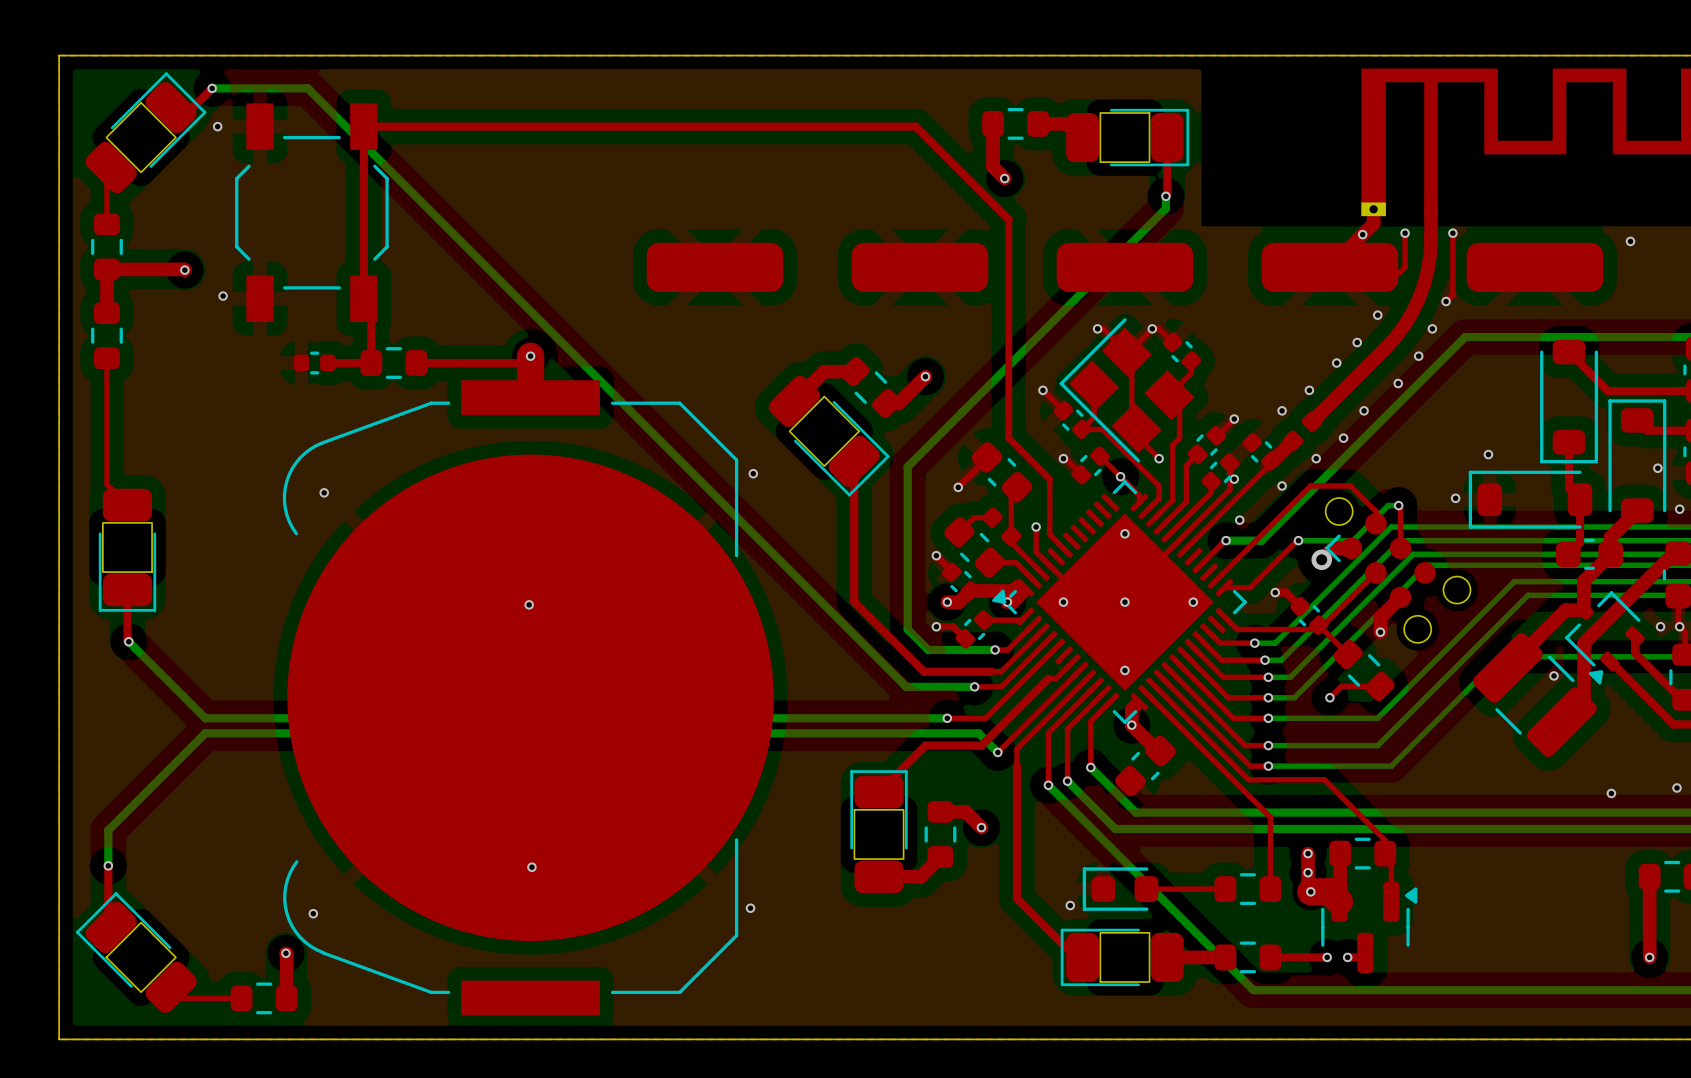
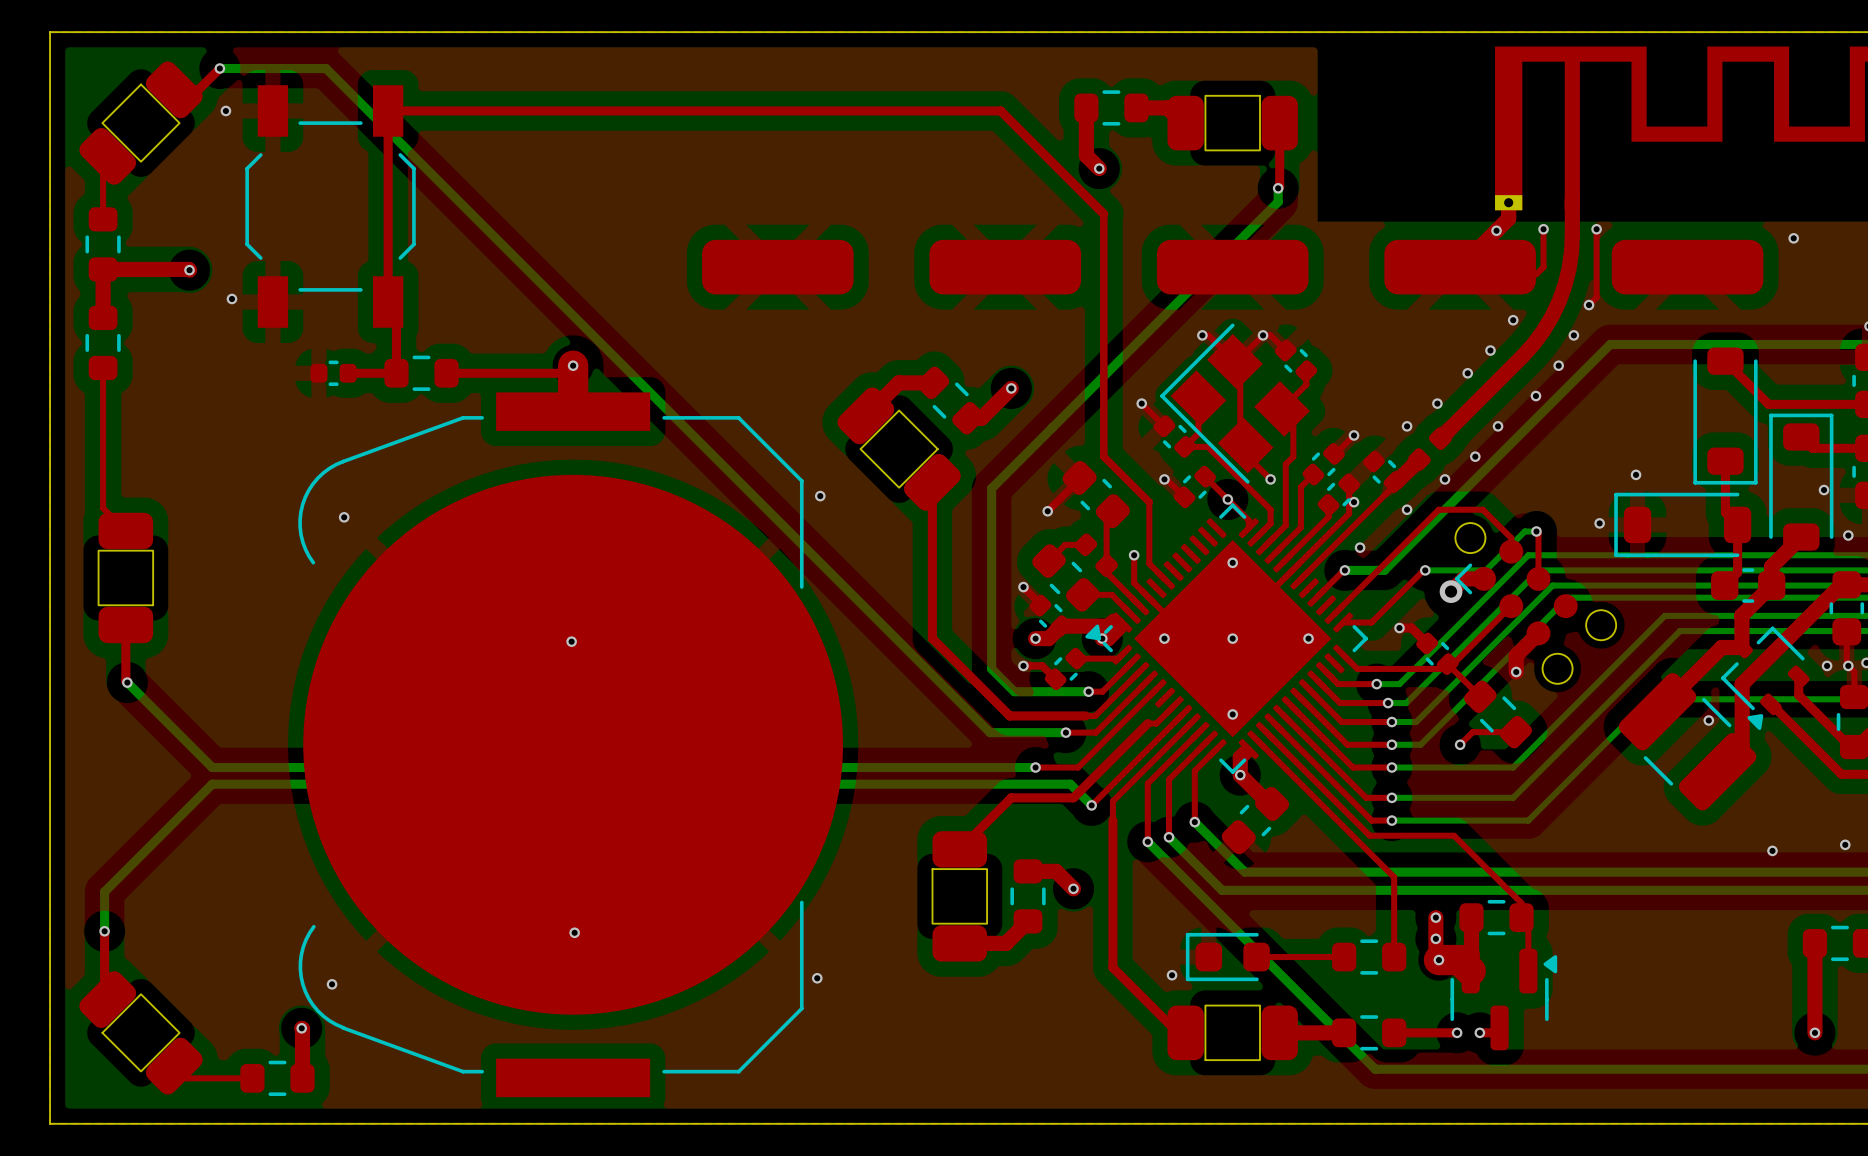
part footprint: [85, 72, 207, 194] -> [79, 61, 203, 185]
part footprint: [1066, 108, 1190, 167] -> [1167, 95, 1298, 152]
part footprint: [768, 375, 890, 497] -> [837, 387, 961, 511]
part footprint: [98, 488, 157, 612] -> [97, 512, 154, 644]
part footprint: [850, 770, 908, 894] -> [931, 831, 988, 962]
part footprint: [75, 892, 197, 1013] -> [79, 971, 203, 1095]
part footprint: [1060, 928, 1184, 987] -> [1167, 1004, 1298, 1061]

